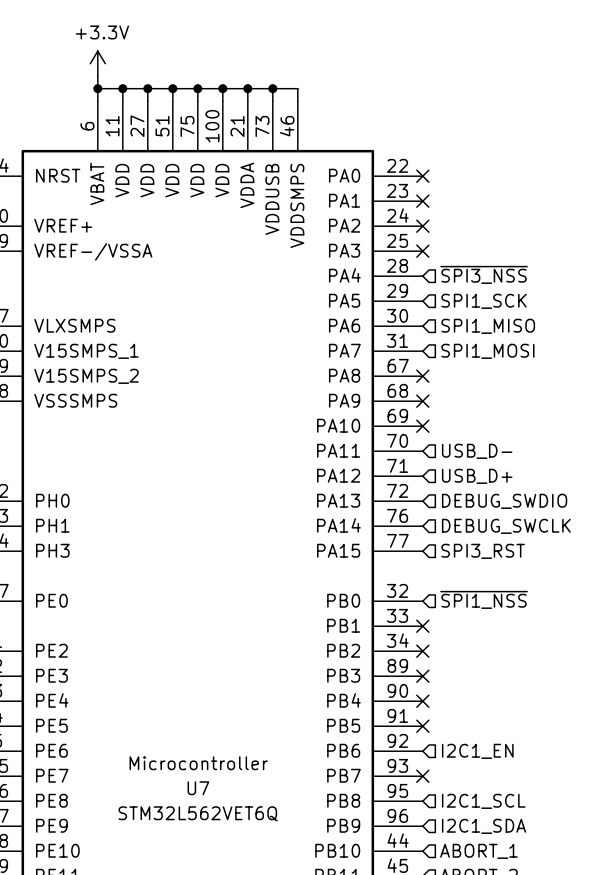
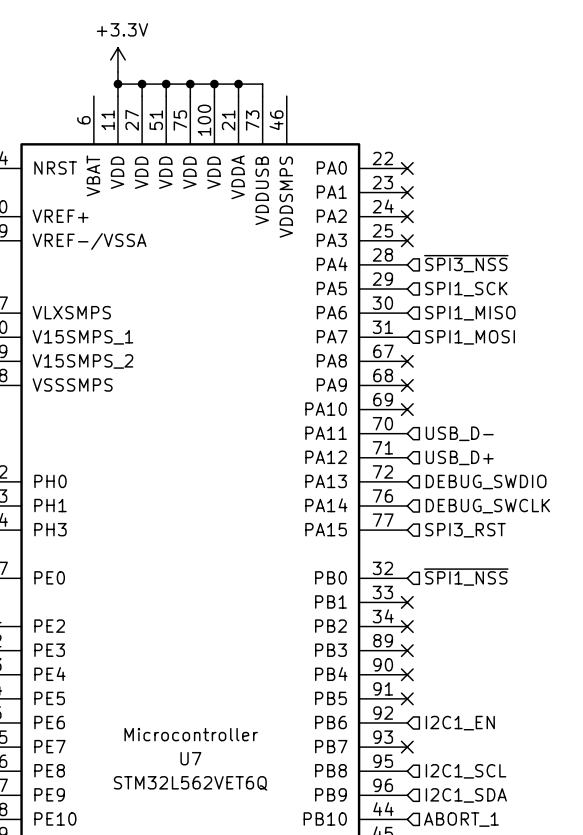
power symbol position: +3.3V (97, 63) -> +3.3V (117, 59)
wire: (97, 76) (97, 101) -> none
wire: (97, 88) (122, 88) -> (117, 72) (117, 84)
junction: (97, 88) -> none
wire: (272, 88) (297, 88) (297, 101) -> none
junction: (272, 88) -> none

